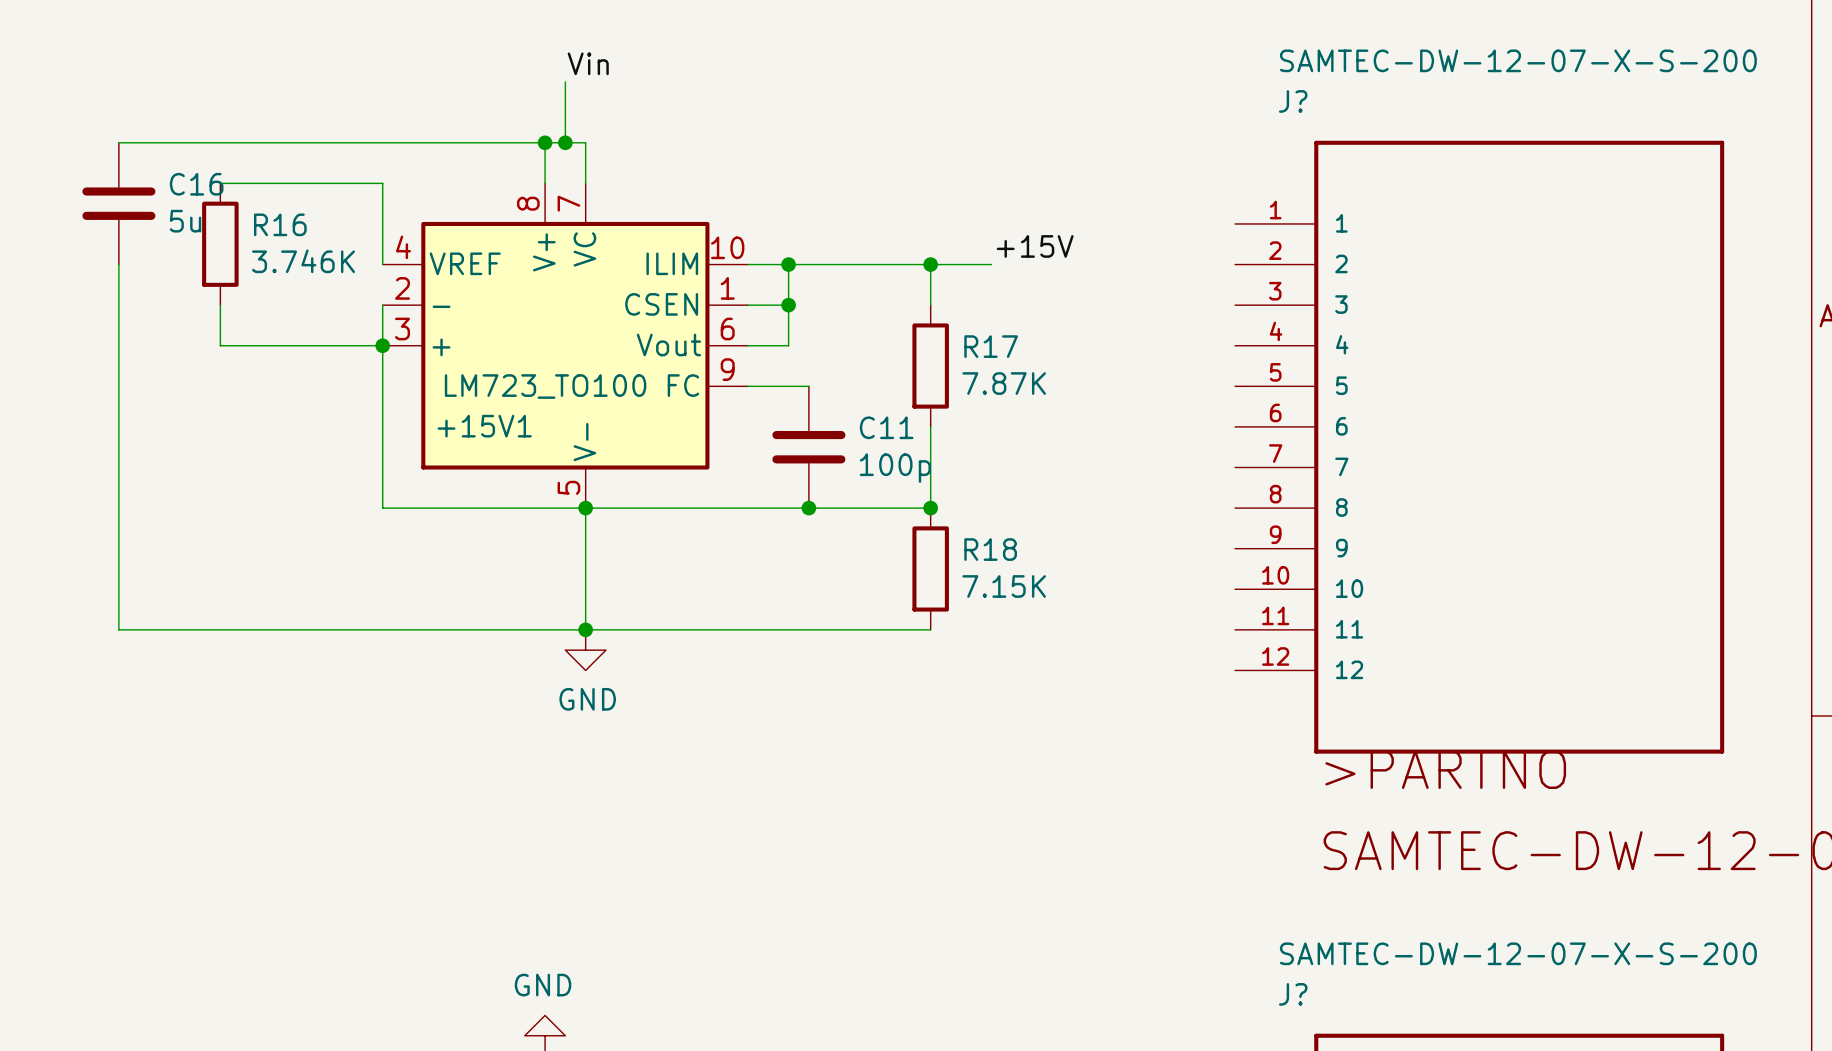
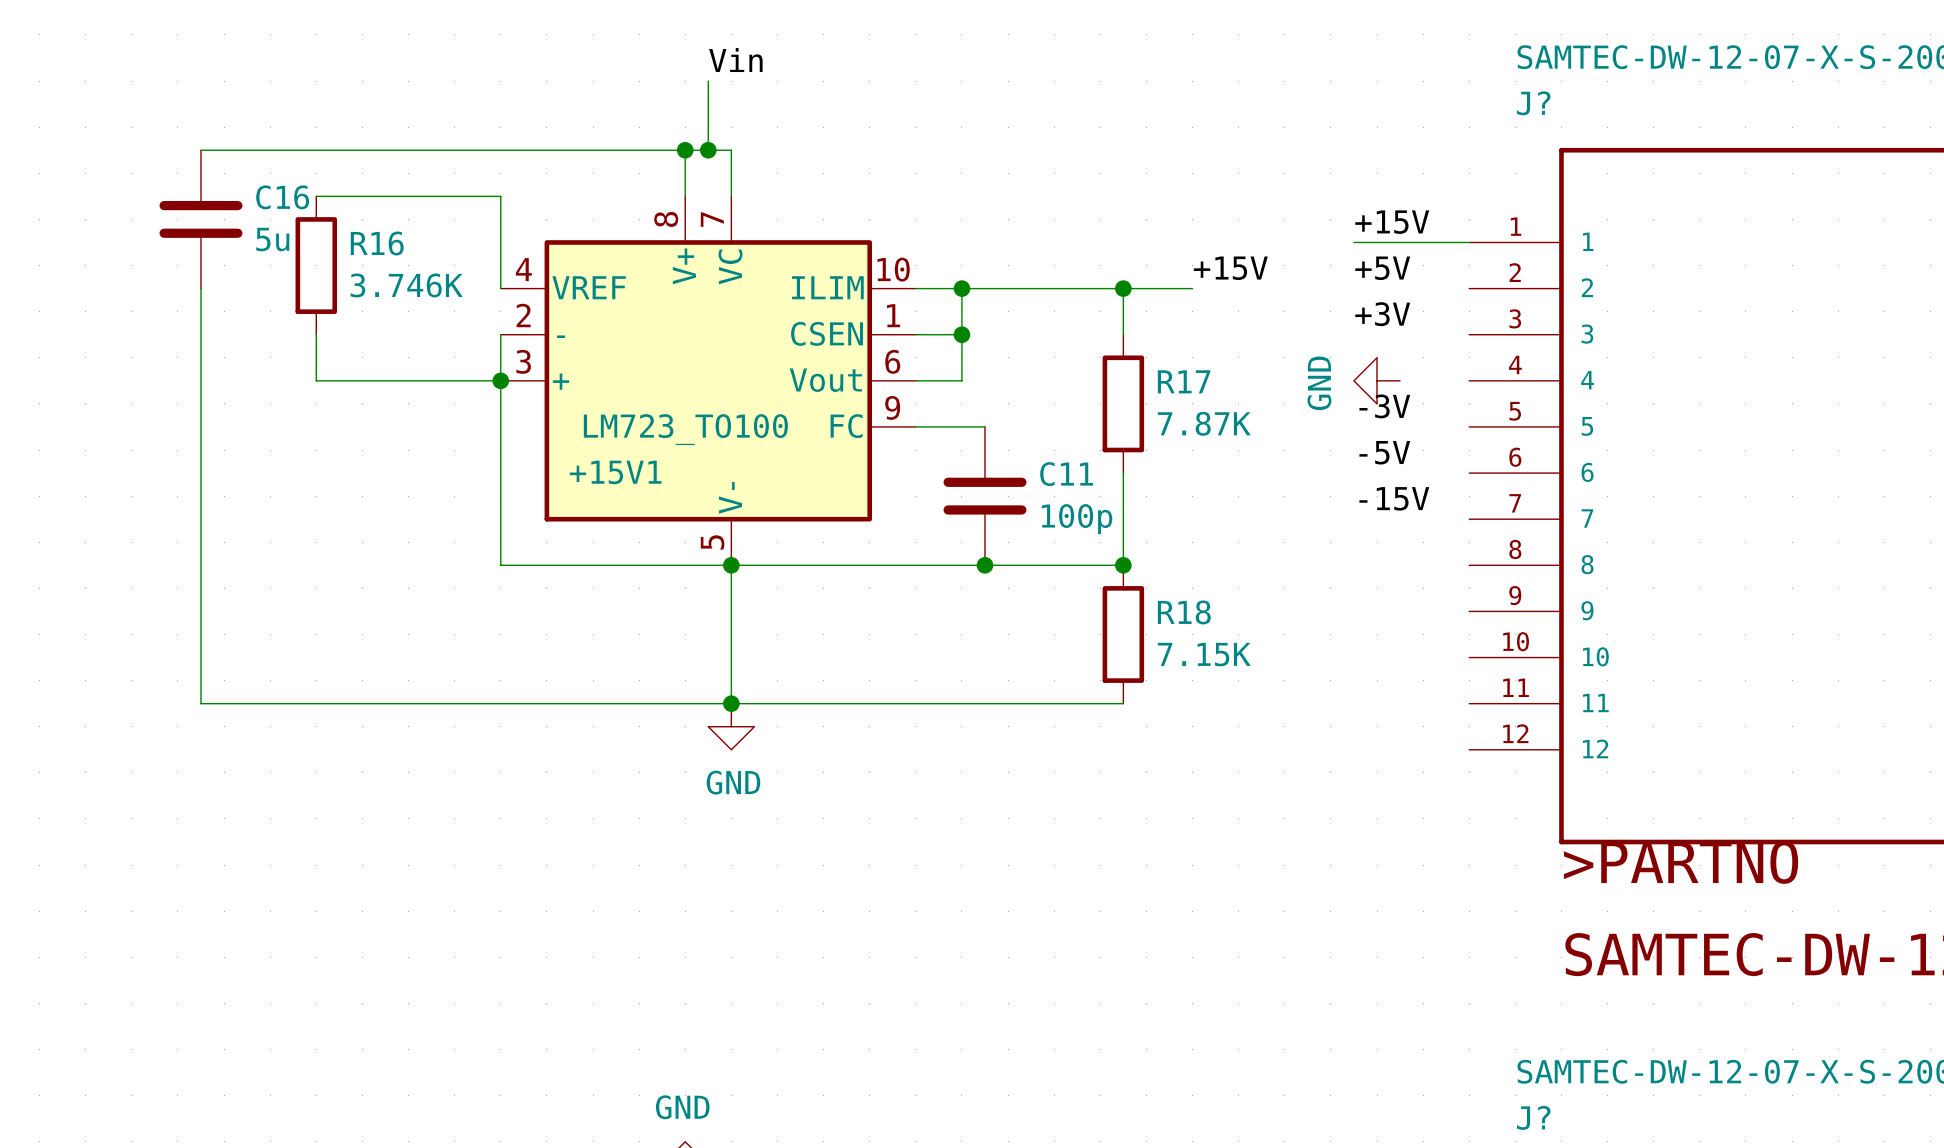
label: none -> +15V (1392, 222)
wire: none -> (1353, 242) (1469, 242)
label: none -> +5V (1382, 268)
label: none -> +3V (1382, 314)
power symbol: none -> GND (1377, 380)
label: none -> -3V (1384, 406)
label: none -> -5V (1384, 452)
label: none -> -15V (1394, 498)

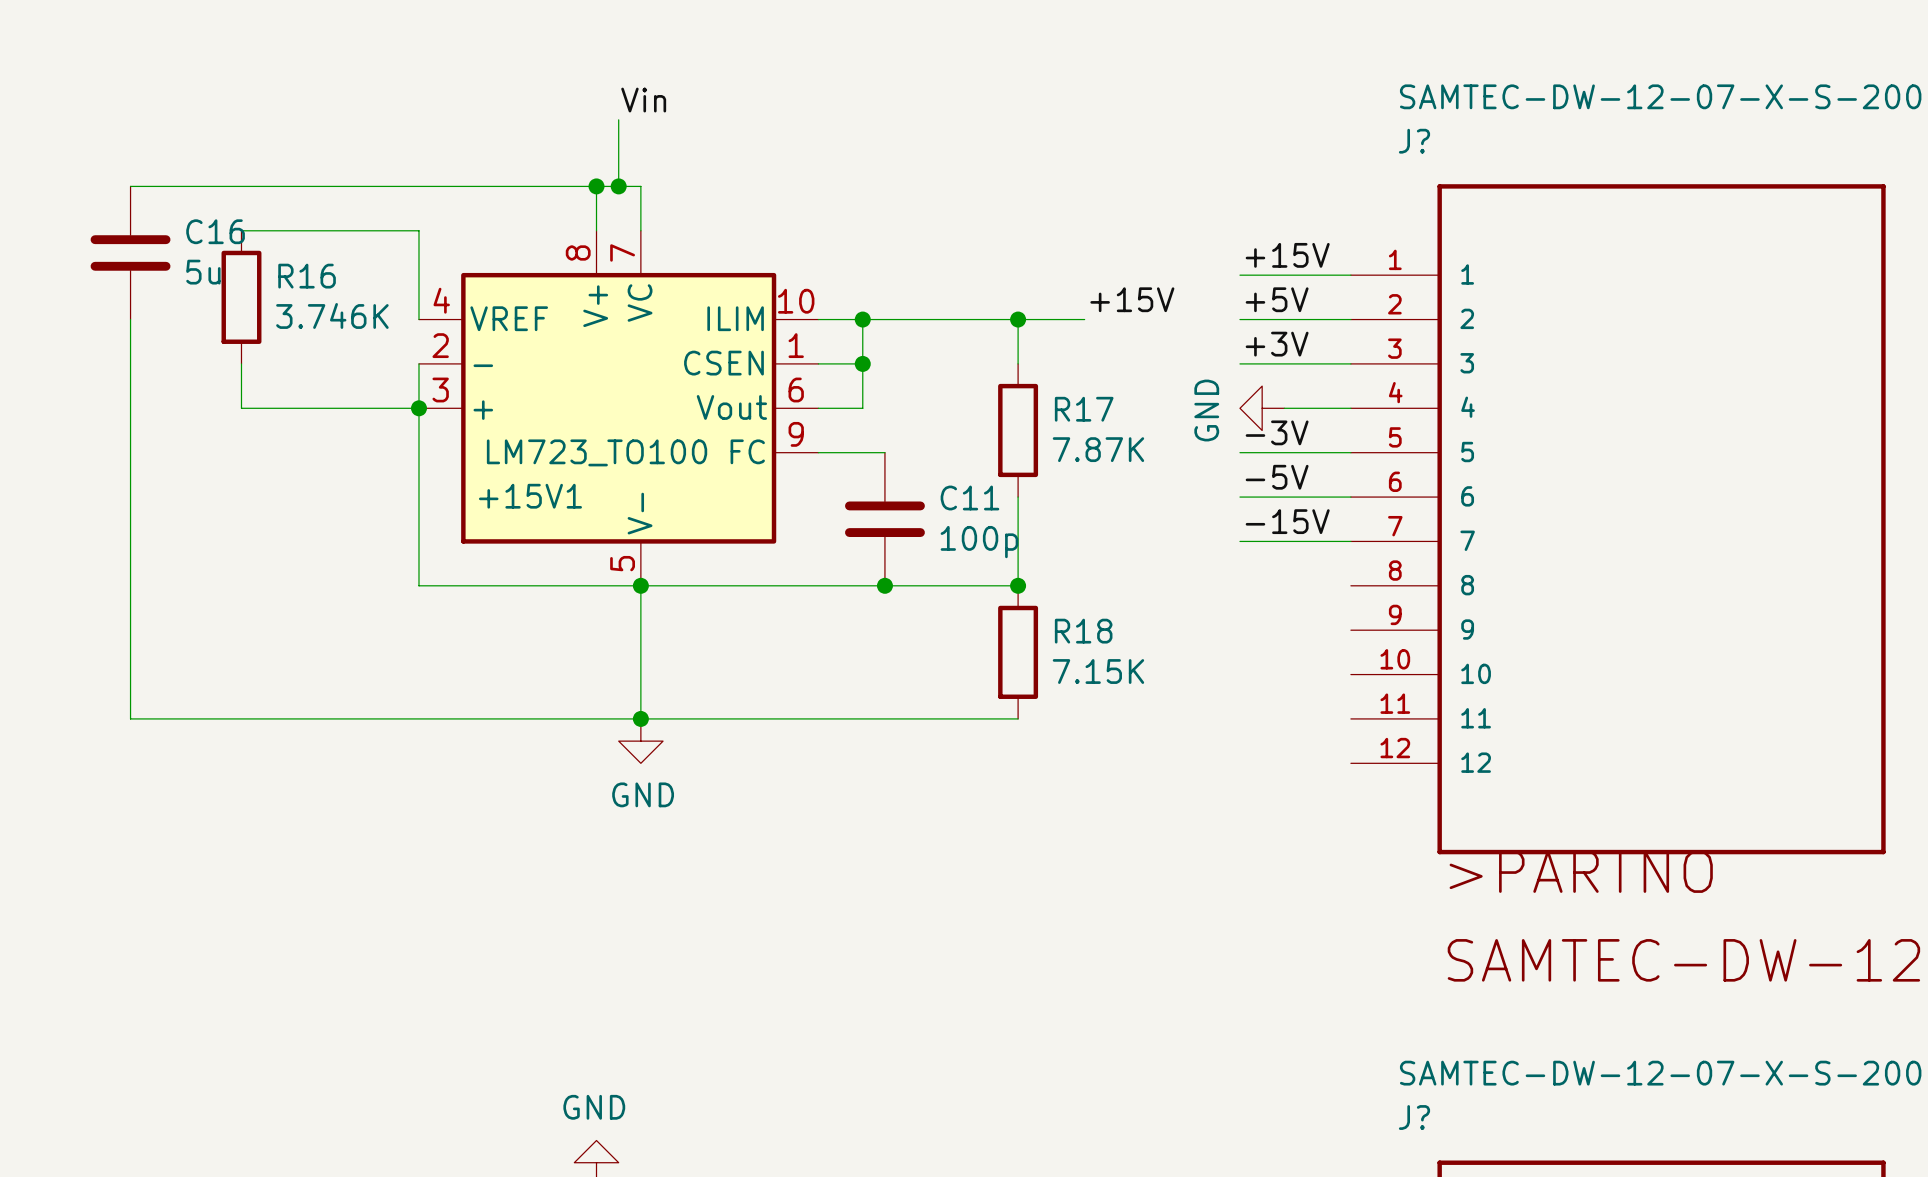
wire: none -> (1239, 319) (1350, 319)
wire: none -> (1239, 363) (1350, 363)
wire: none -> (1284, 408) (1350, 408)
wire: none -> (1239, 452) (1350, 452)
wire: none -> (1239, 497) (1350, 497)
wire: none -> (1239, 541) (1350, 541)

